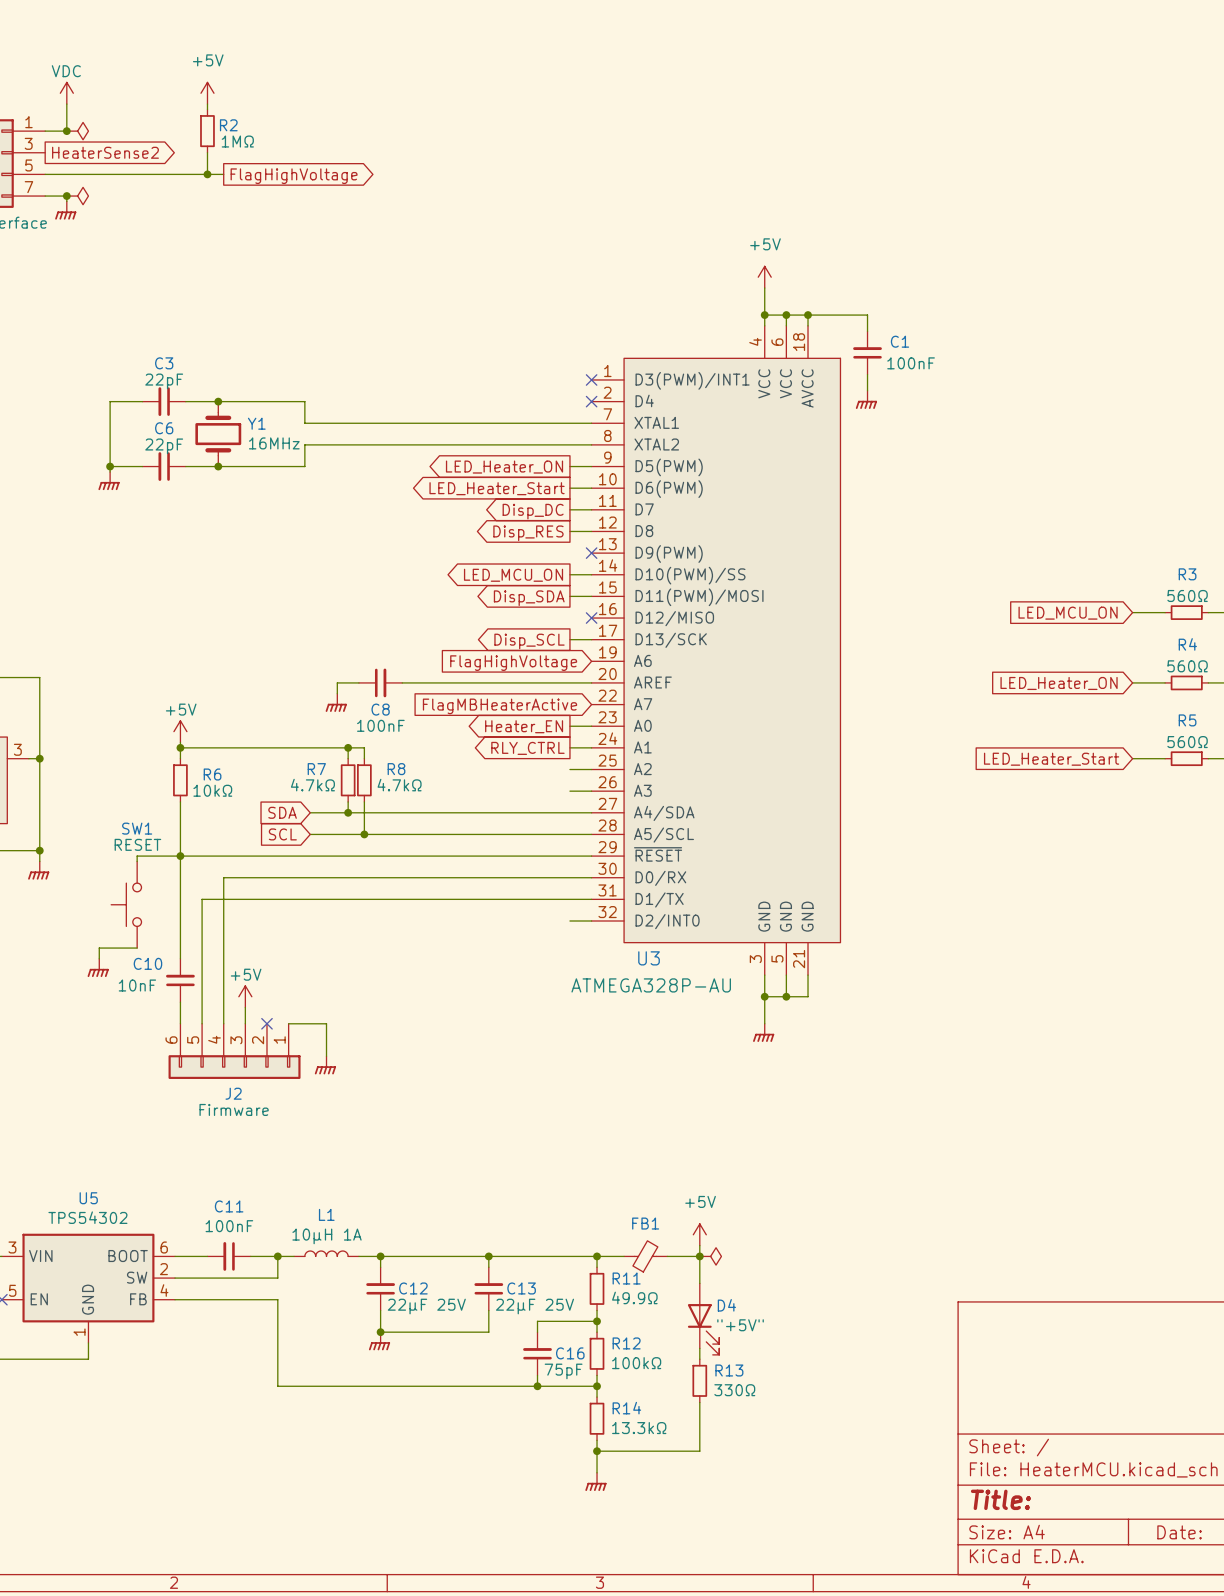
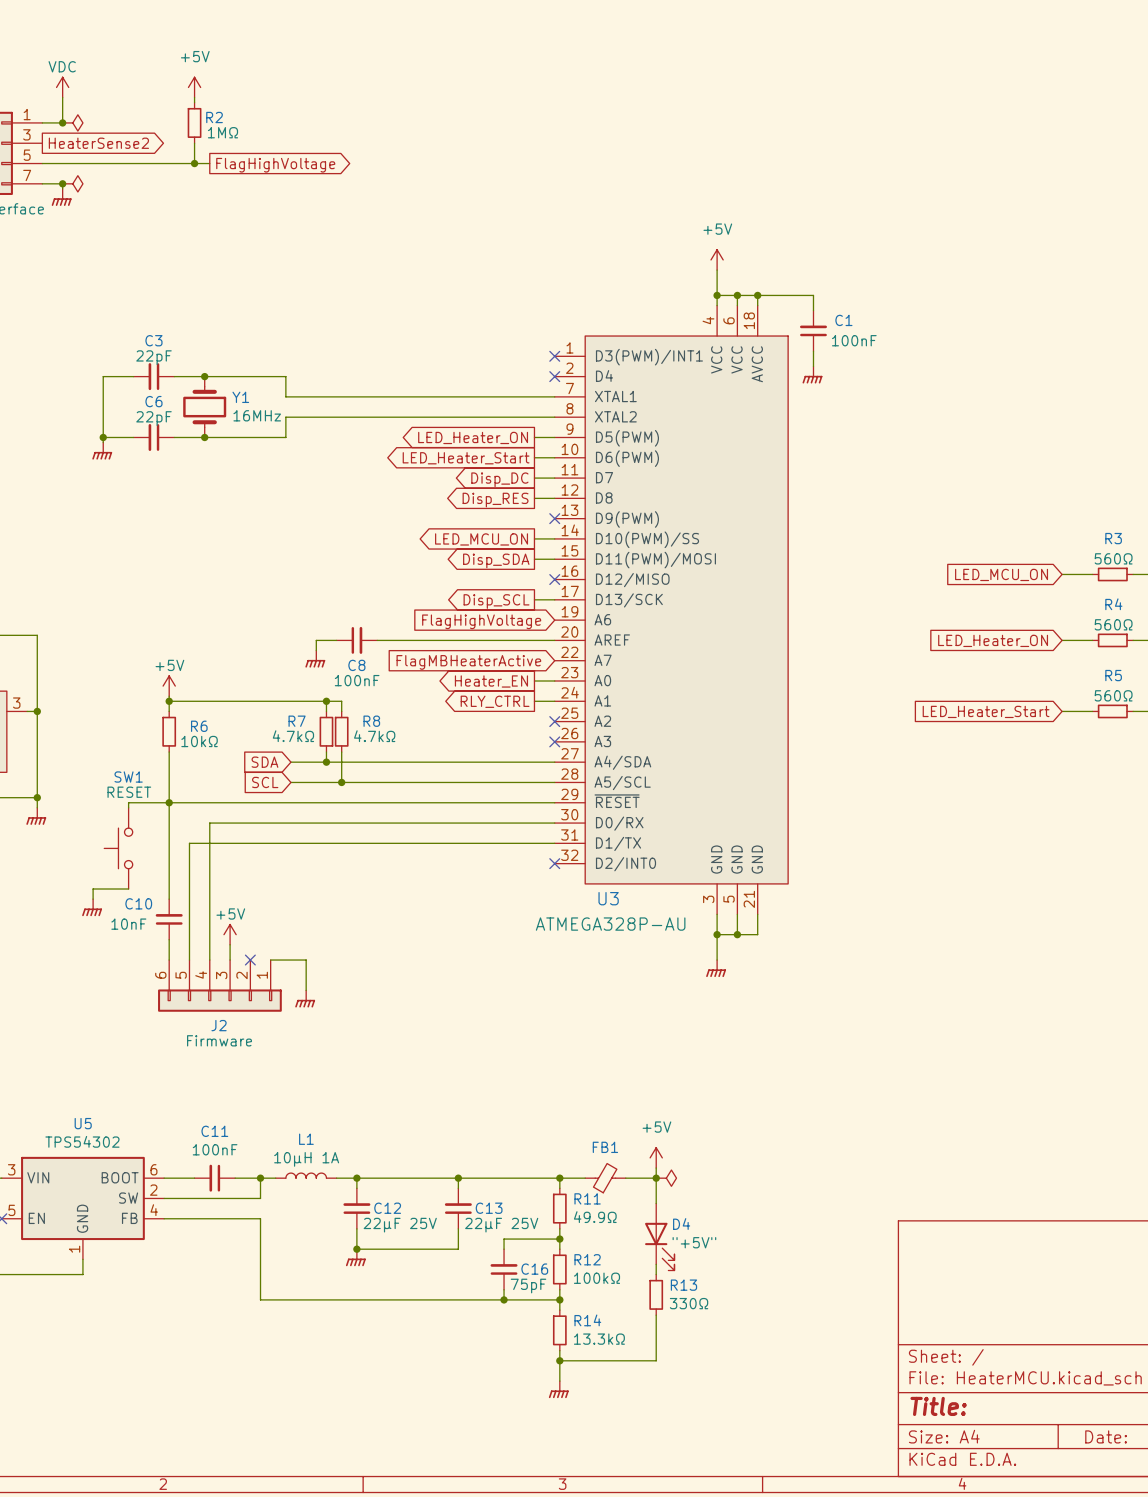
wire: (569, 769) (591, 769) -> none
no-connect mark: none -> (554, 721)
wire: (569, 791) (591, 791) -> none
no-connect mark: none -> (554, 741)
wire: (569, 920) (591, 920) -> none
no-connect mark: none -> (554, 863)

